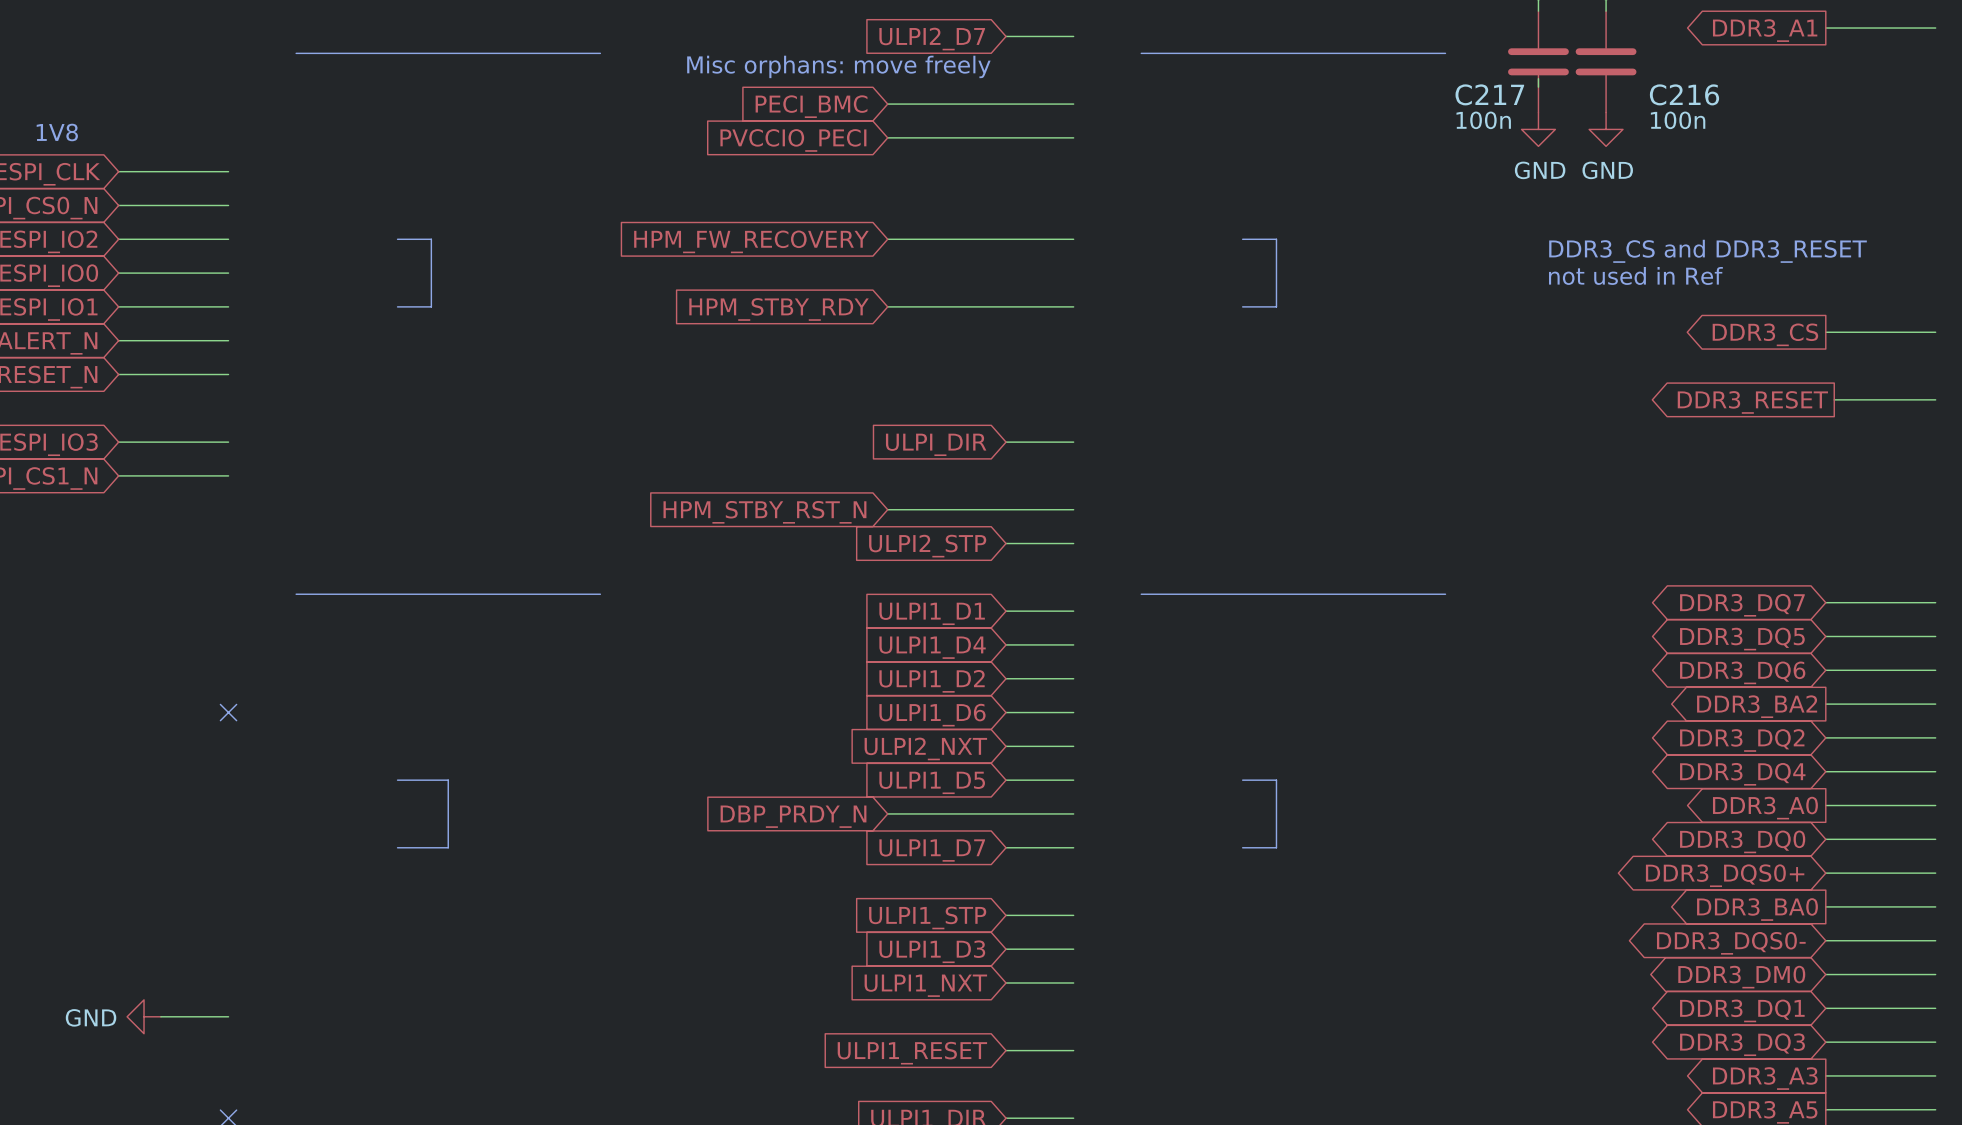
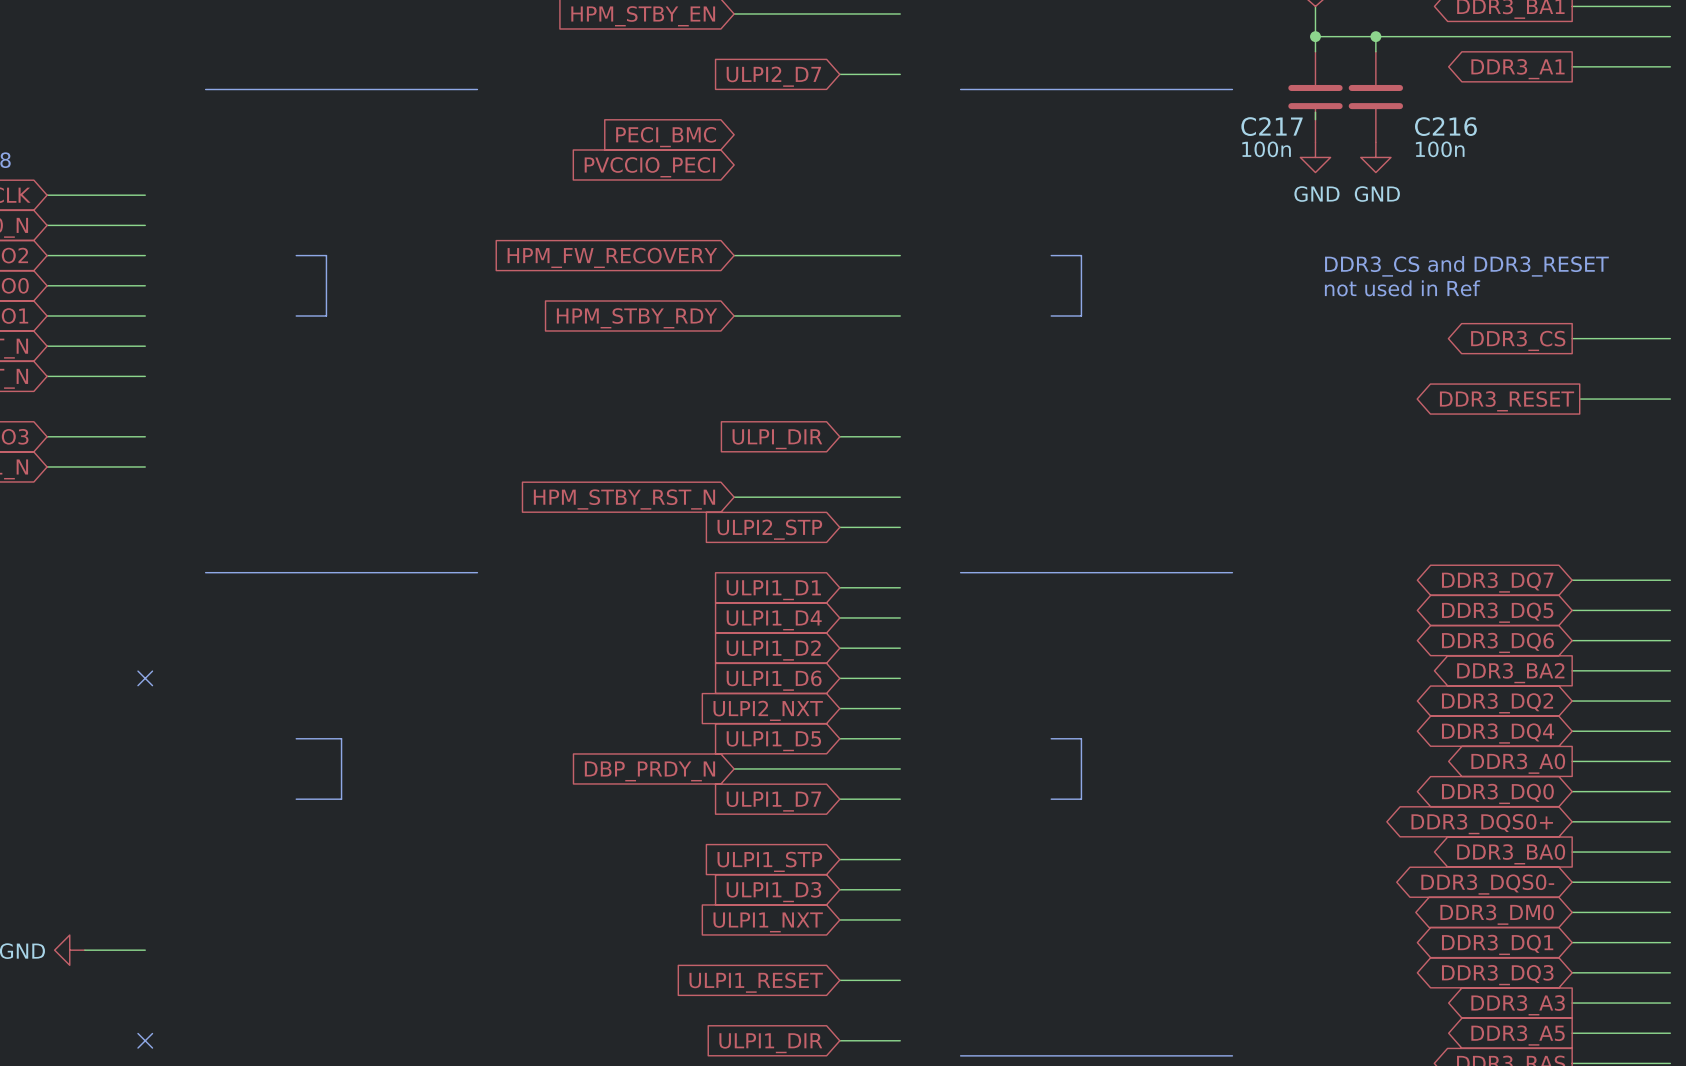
text: Misc orphans: move freely (838, 66) -> none
wire: (887, 104) (1073, 104) -> none
wire: (887, 137) (1073, 137) -> none

